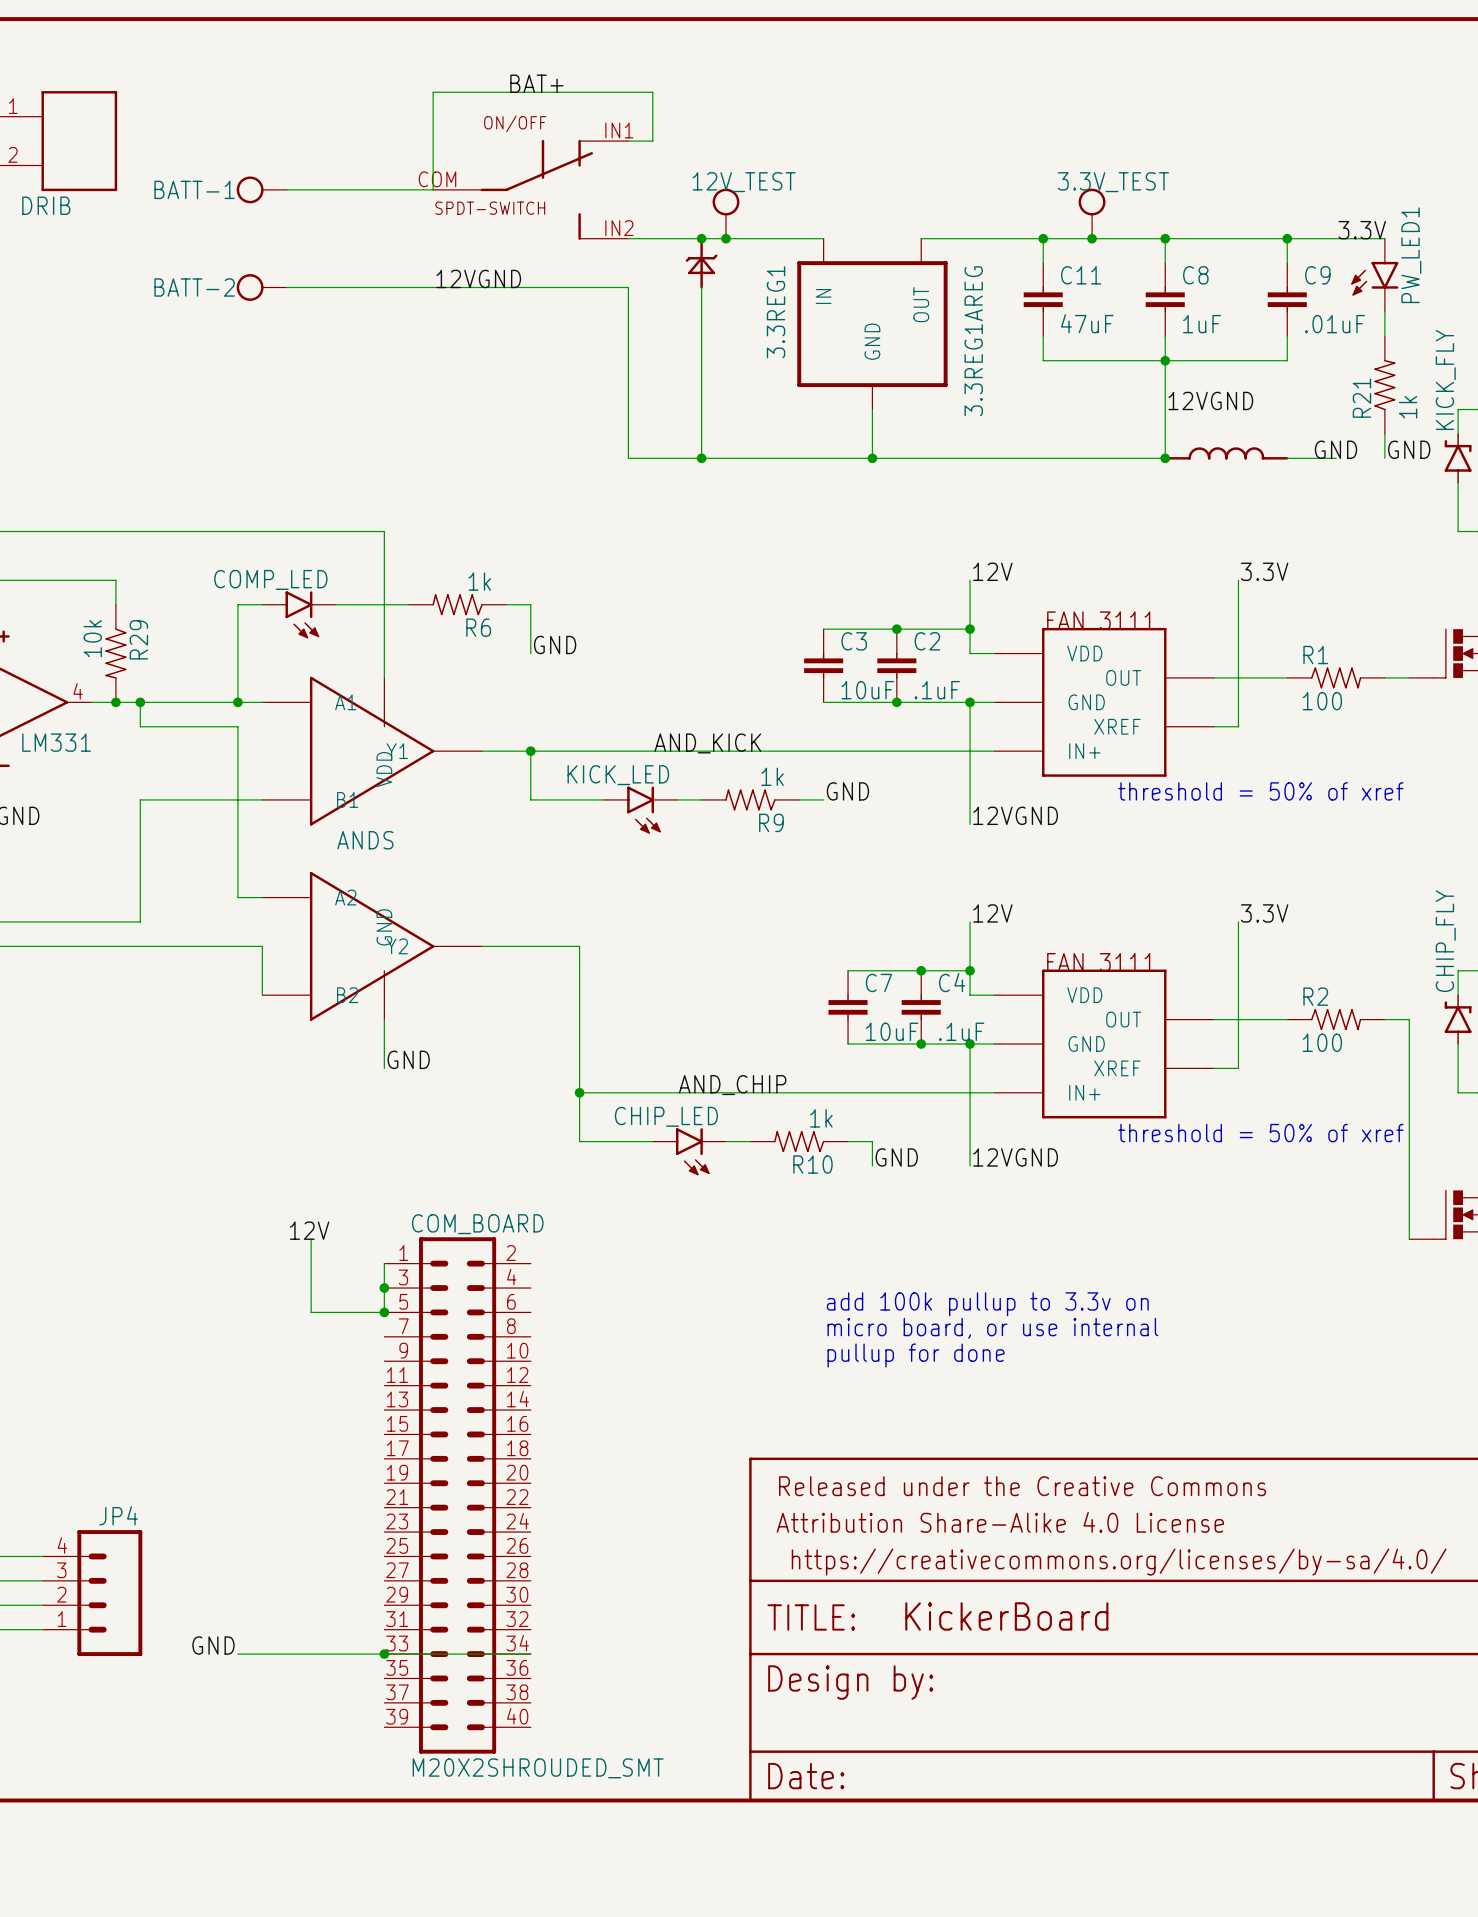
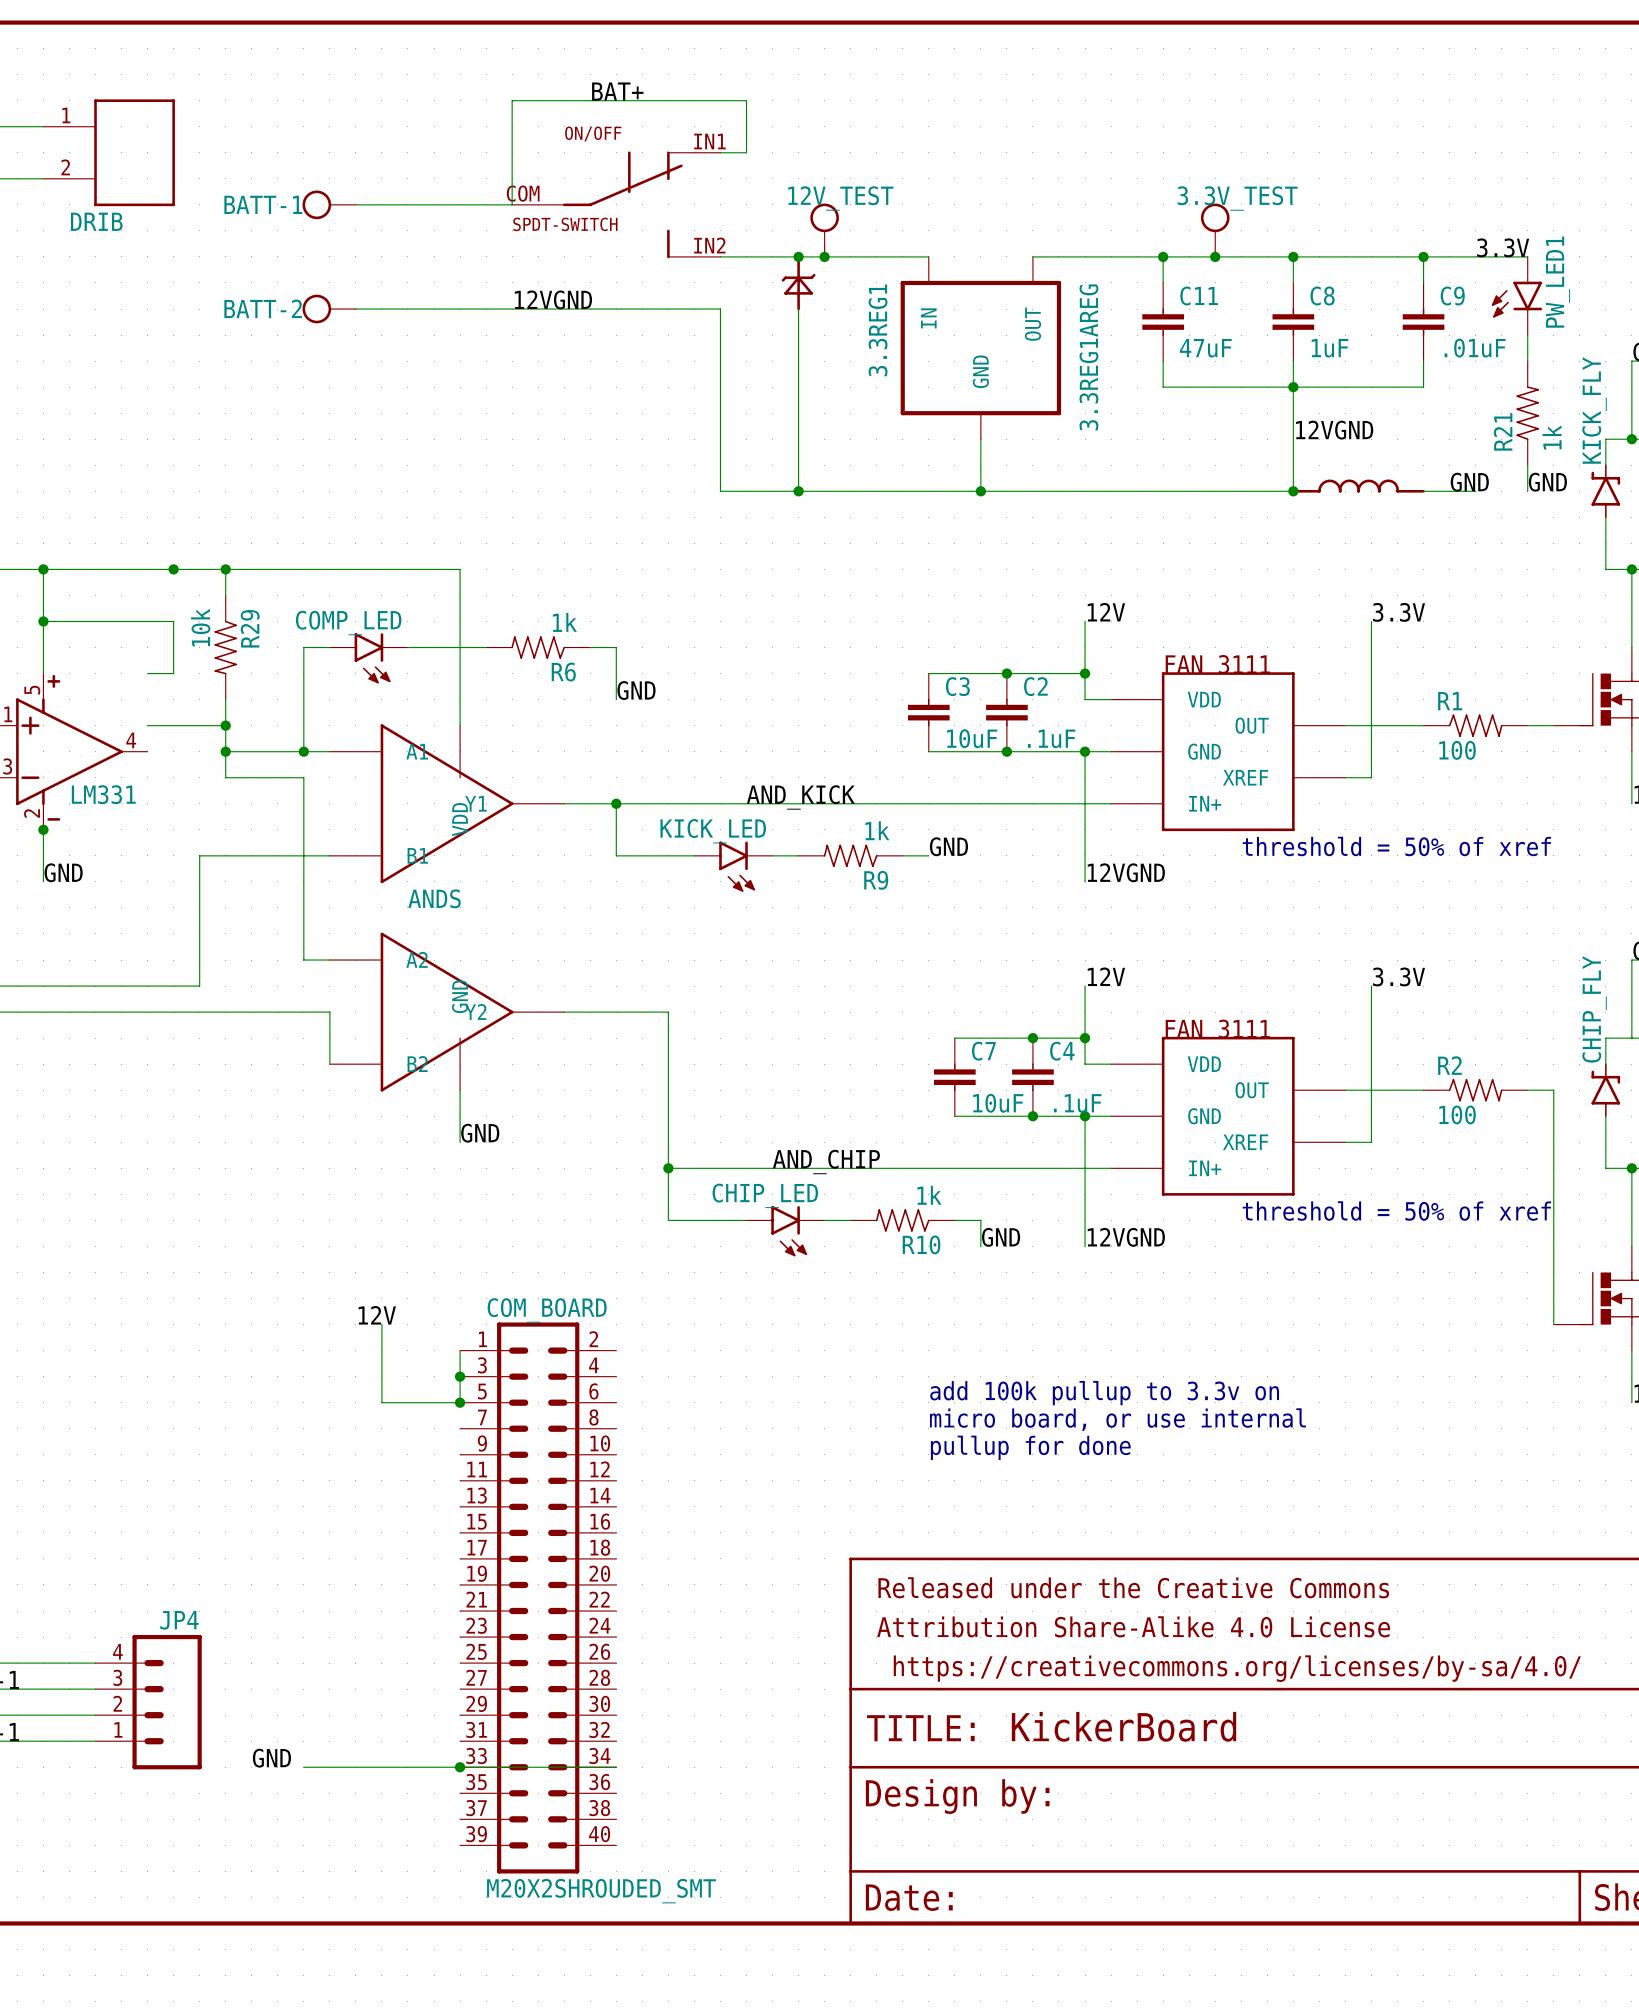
junction: none -> (173, 569)
wire: none -> (225, 569) (225, 595)
junction: none -> (225, 569)
wire: none -> (173, 647) (173, 673) (147, 673)
R29 position: (115, 653) -> (225, 647)
junction: none -> (225, 725)
wire: (91, 702) (164, 702) -> (147, 725) (225, 725)
junction: (115, 702) -> none
wire: (140, 702) (140, 726) (164, 726) -> (225, 699) (225, 777)
junction: (140, 702) -> none
junction: none -> (225, 751)

